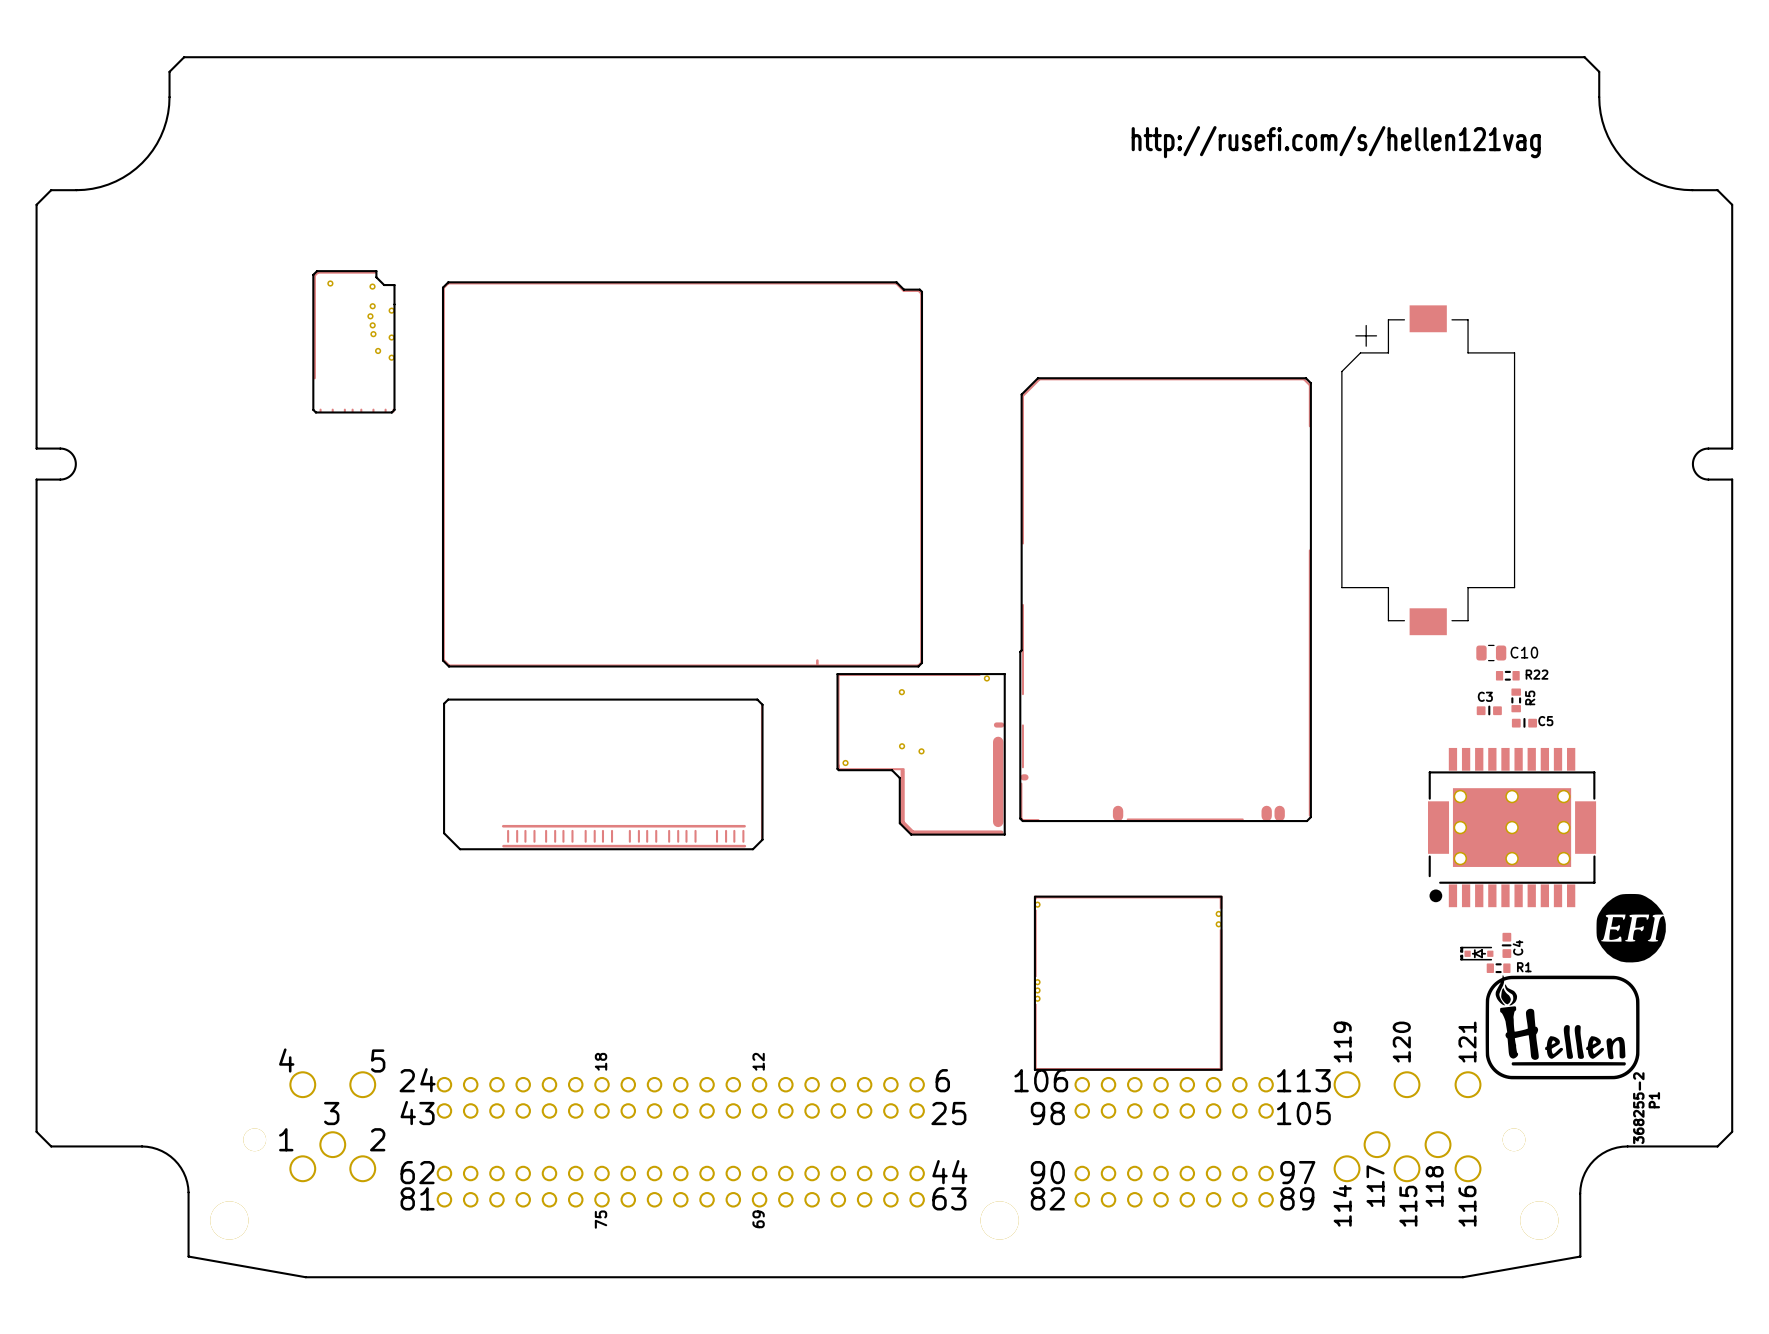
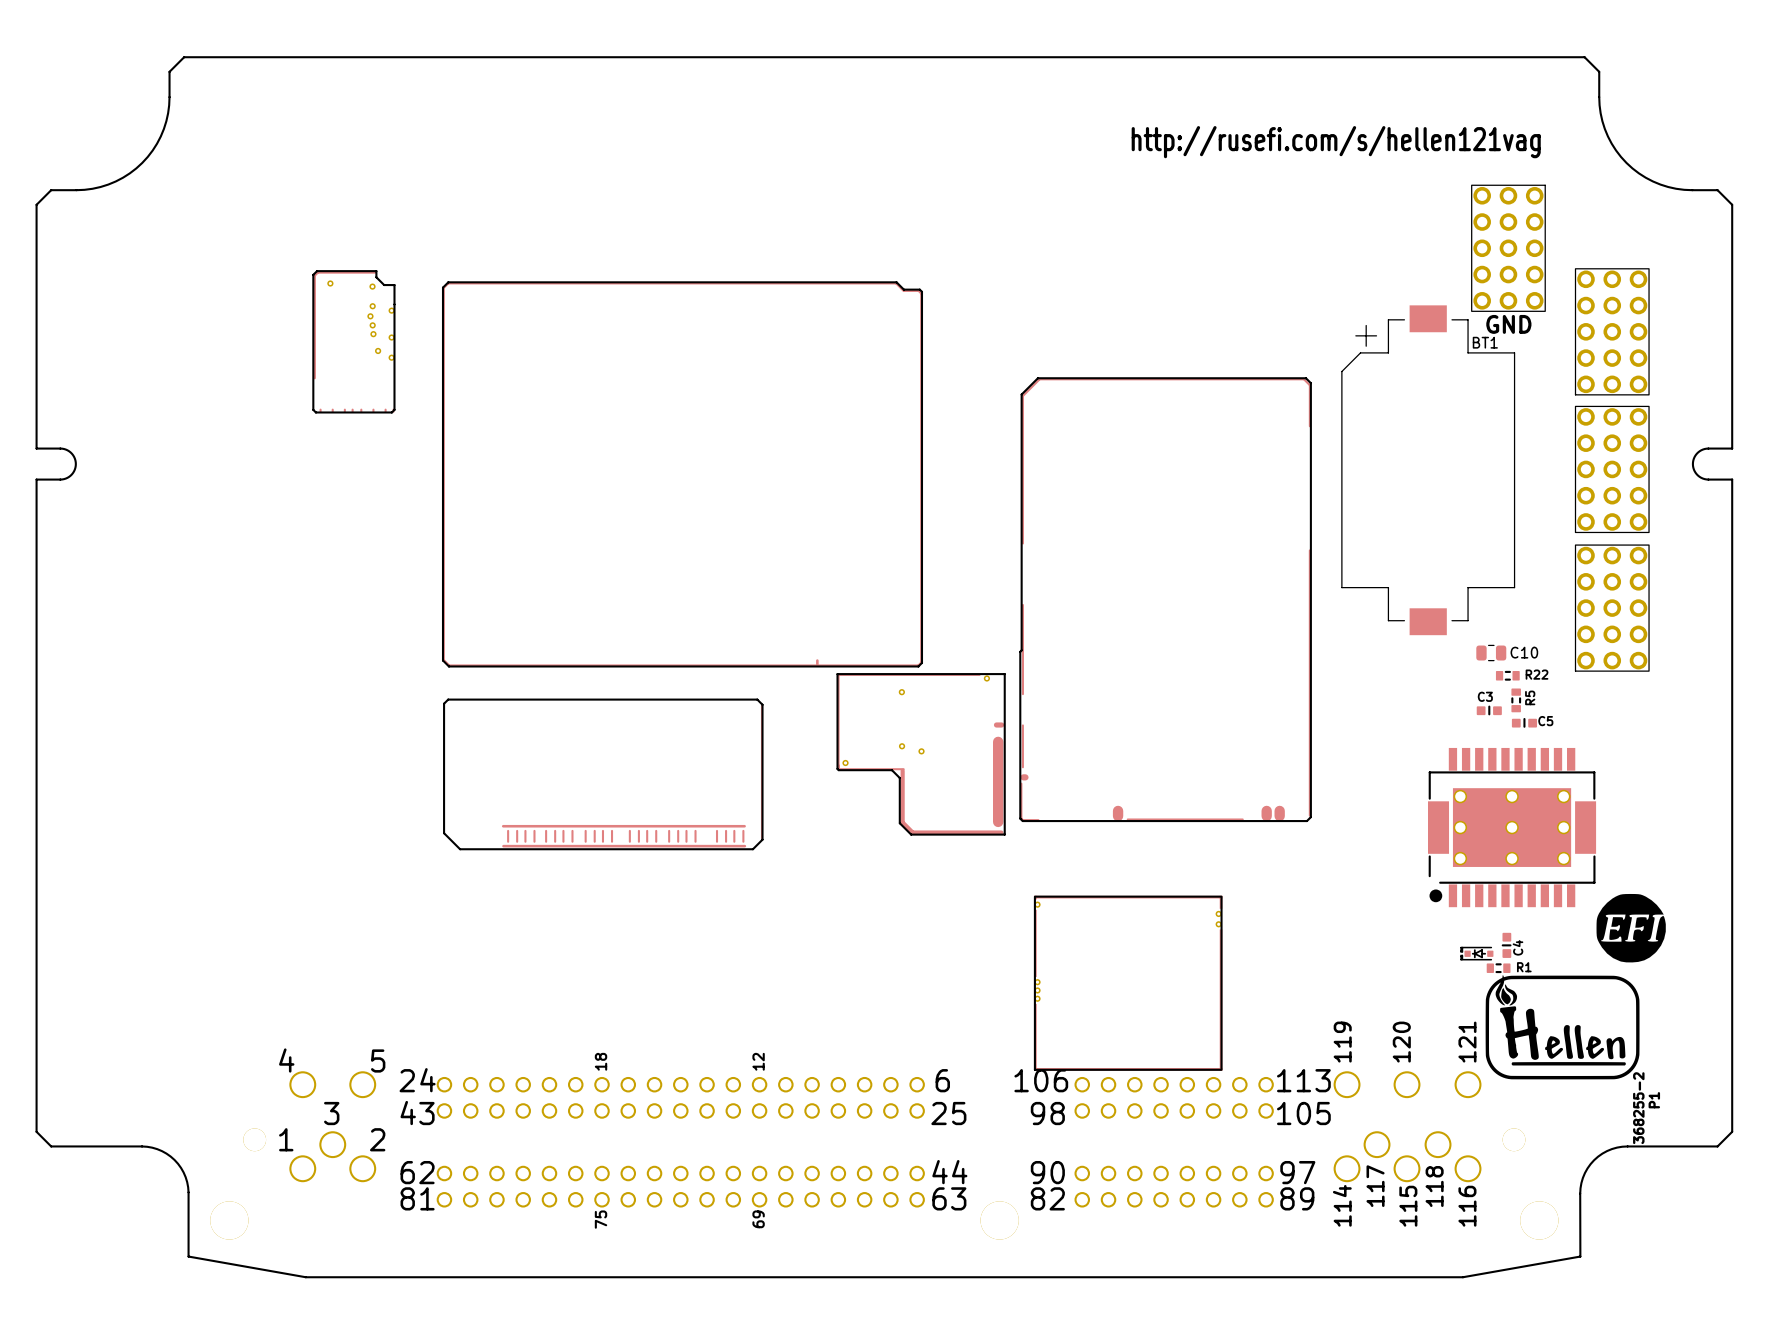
part: none -> (1508, 248)
text: none -> GND (1508, 324)
part: none -> (1612, 331)
BT1 name: none -> BT1 (1485, 342)
part: none -> (1612, 469)
part: none -> (1612, 608)

